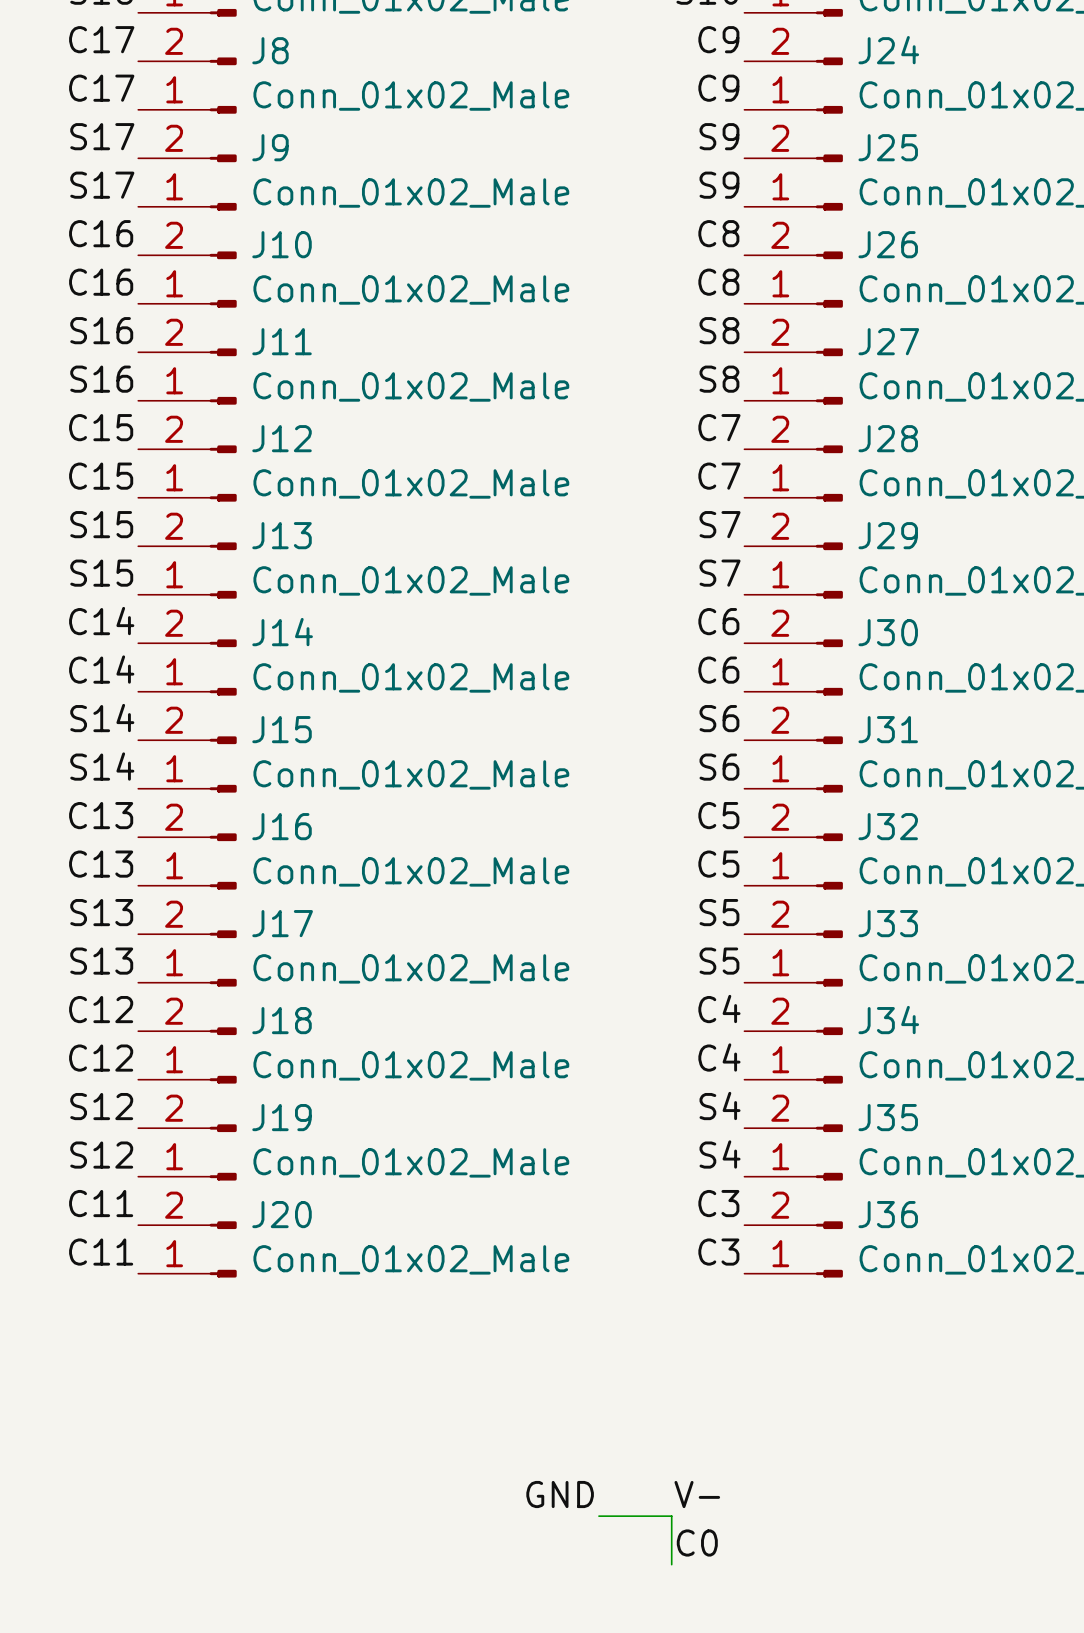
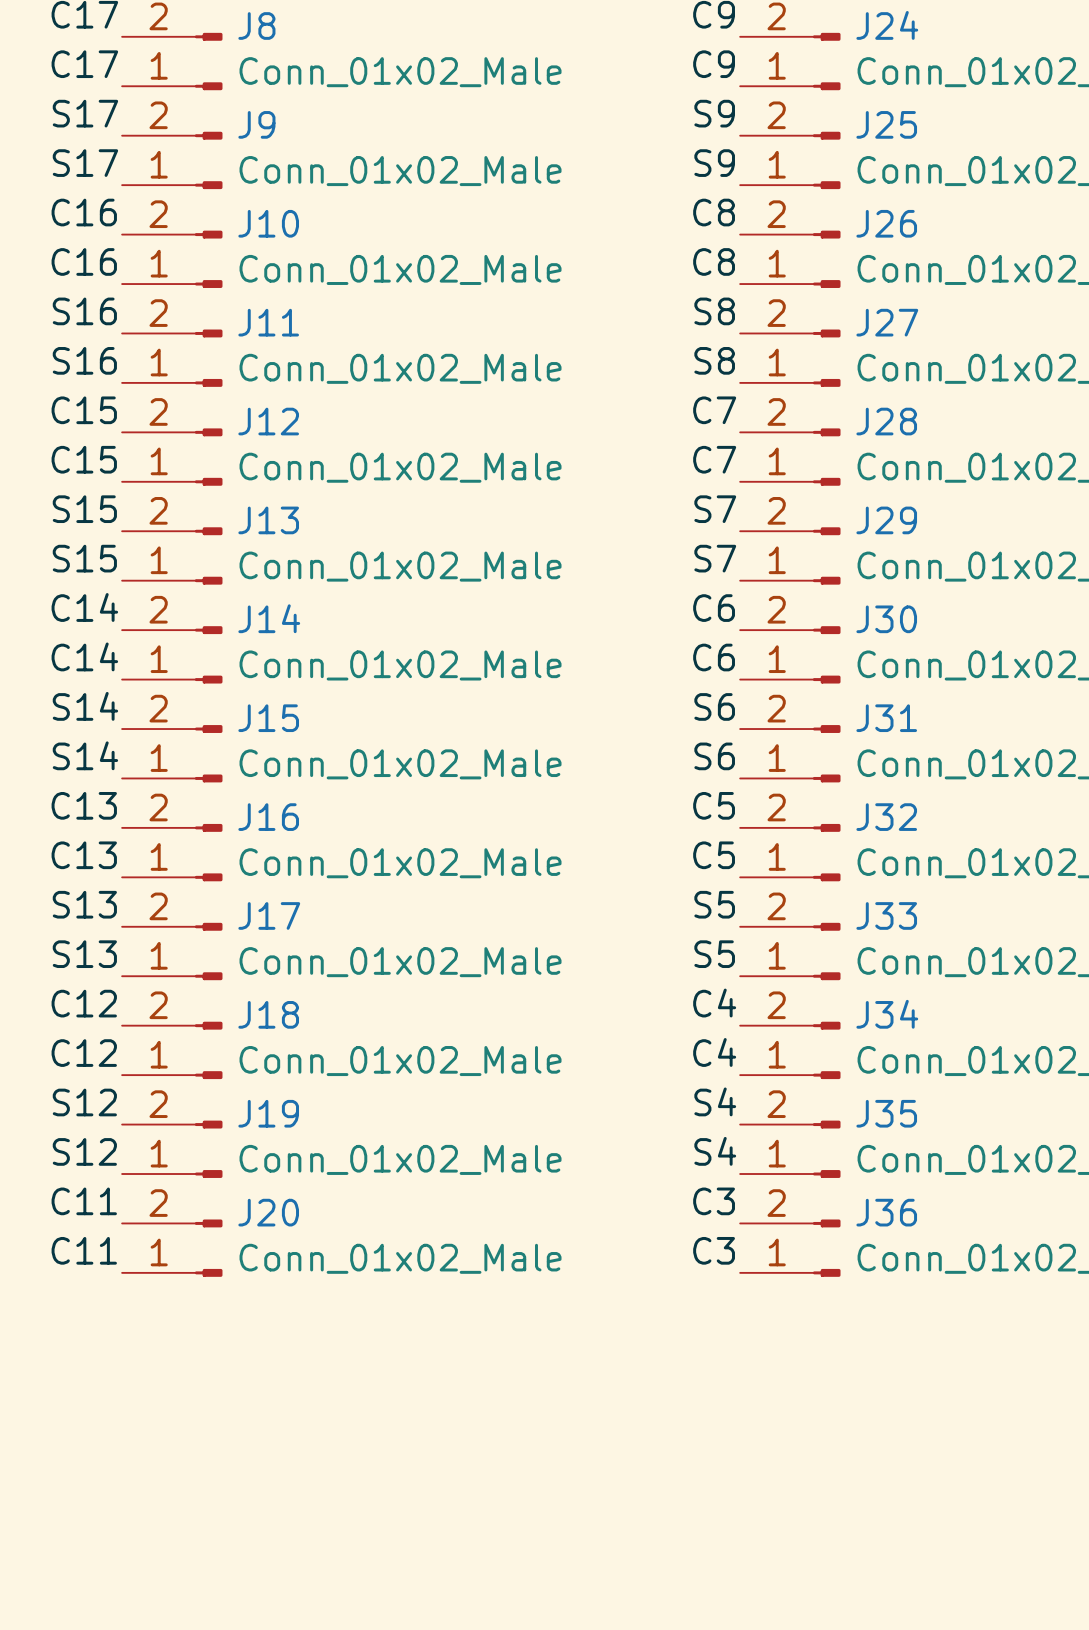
label: GND (560, 1494) -> none
label: V- (697, 1494) -> none
wire: (598, 1516) (671, 1516) (671, 1564) -> none
label: C0 (697, 1543) -> none

